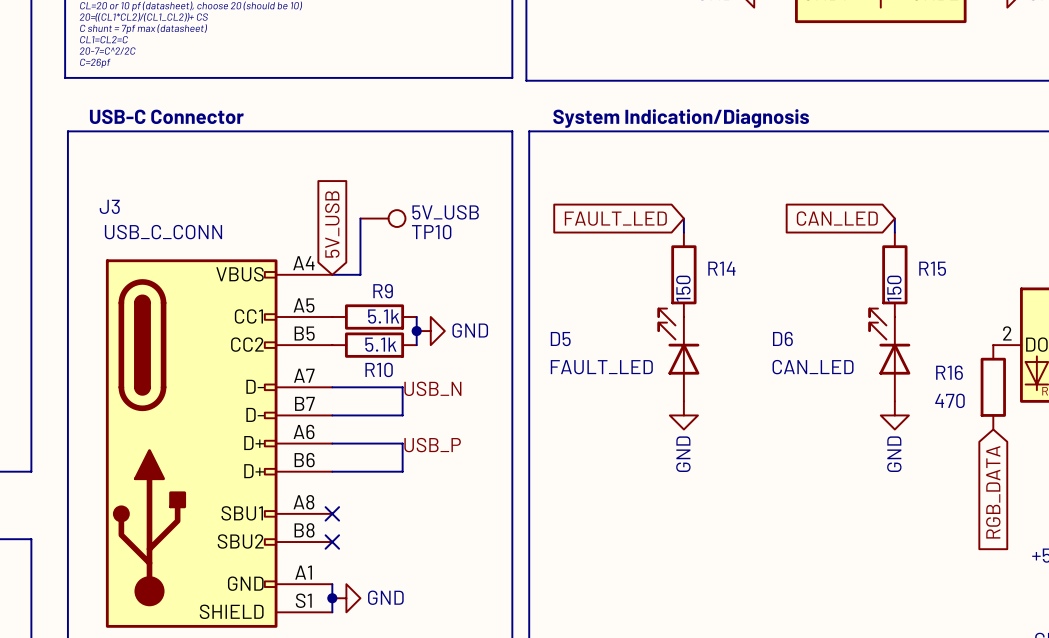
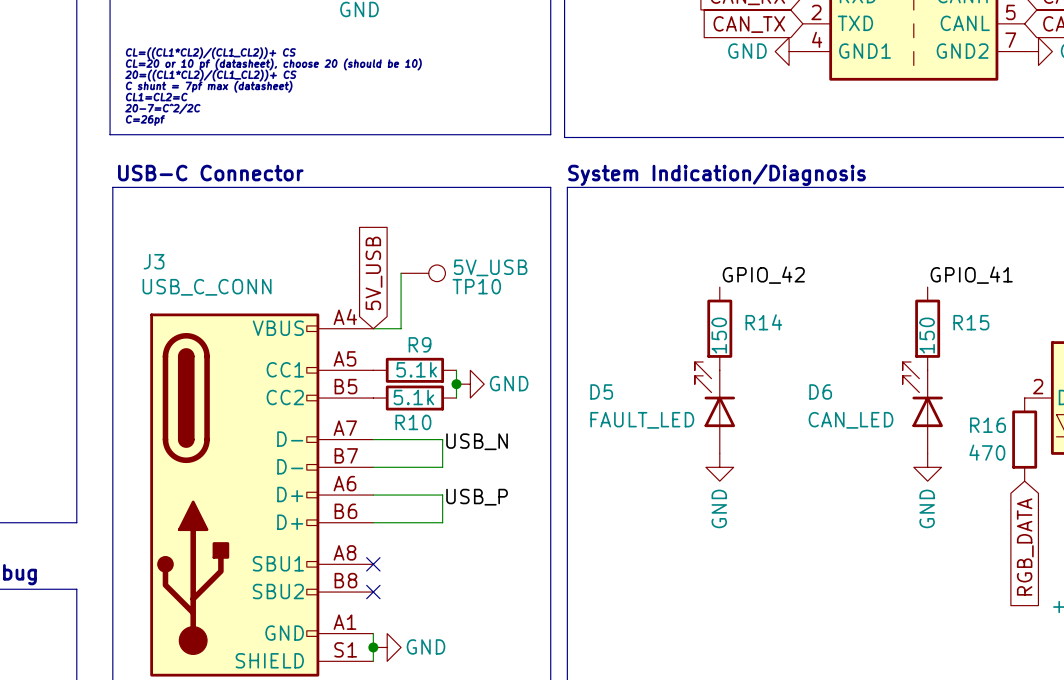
global label: FAULT_LED (615, 218) -> none
wire: (683, 218) (683, 232) -> none
global label: CAN_LED (837, 218) -> none
wire: (894, 218) (894, 232) -> none
label: none -> GPIO_42 (763, 275)
label: none -> GPIO_41 (971, 275)

